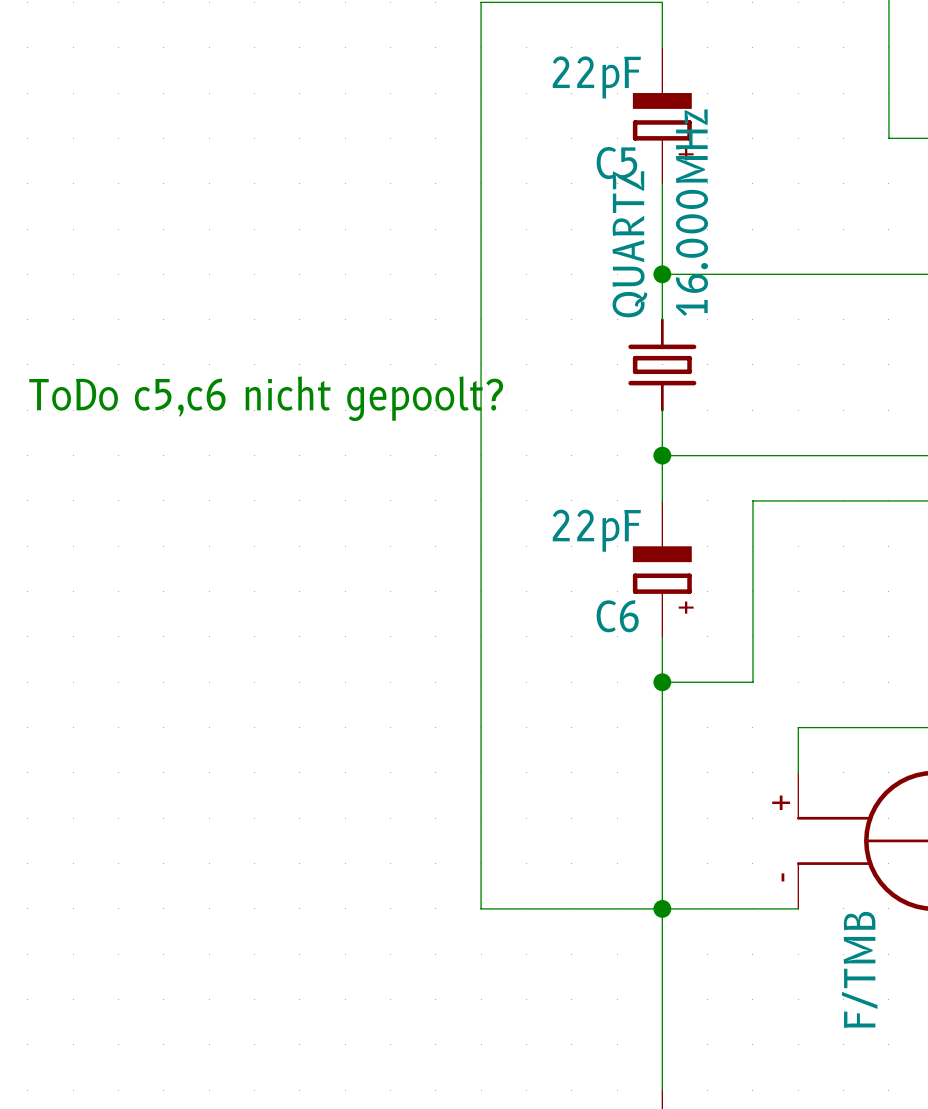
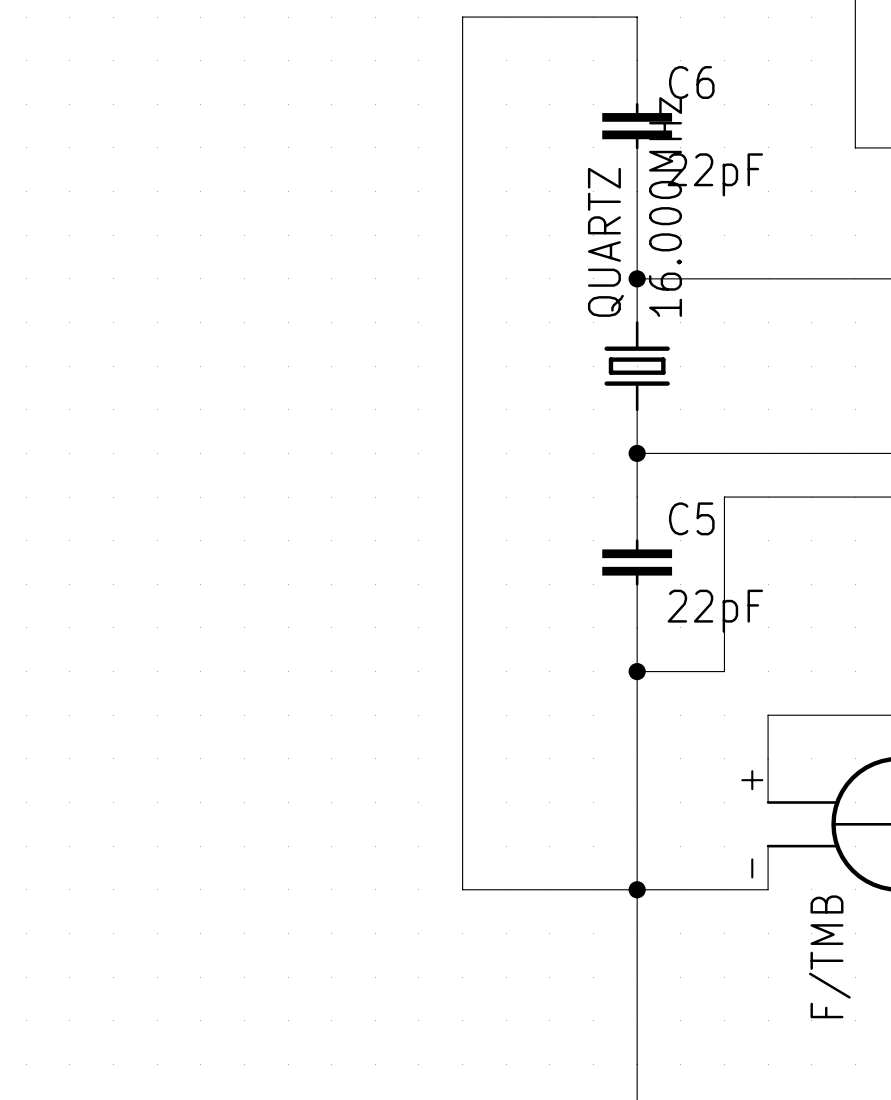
C5 symbol: [632, 47, 692, 184] -> [602, 497, 673, 628]
C5 value position: 22pF (596, 77) -> 22pF (715, 611)
C5 name position: C5 (616, 163) -> C5 (691, 518)
text: ToDo c5,c6 nicht gepoolt? (266, 398) -> none
C6 symbol: [632, 500, 692, 637] -> [602, 60, 673, 192]
C6 value position: 22pF (596, 530) -> 22pF (715, 174)
C6 name position: C6 (617, 616) -> C6 (691, 82)

